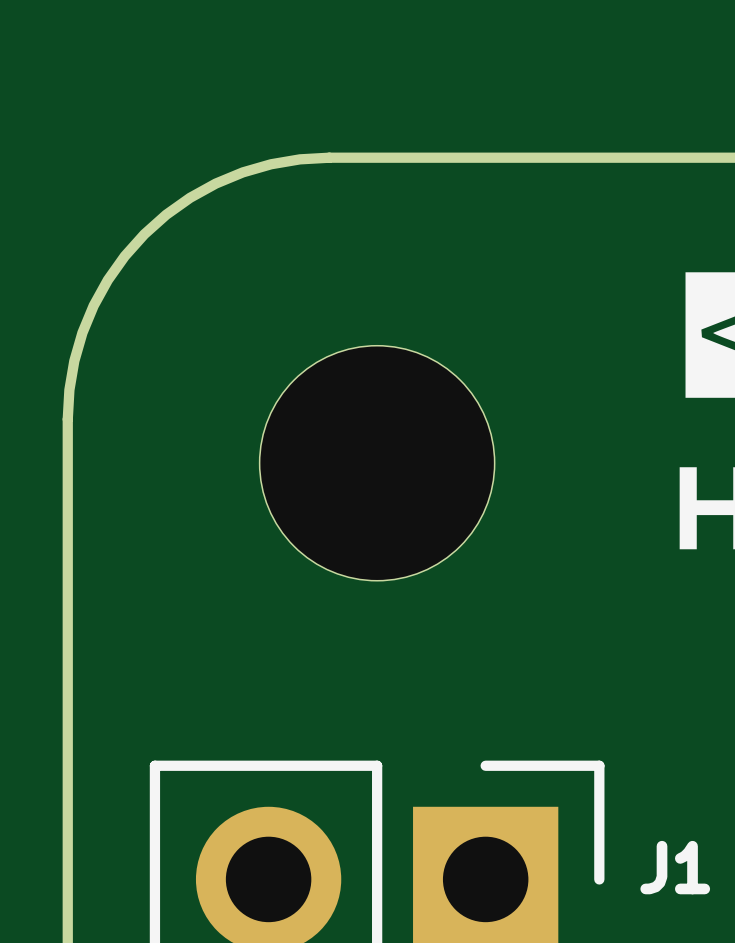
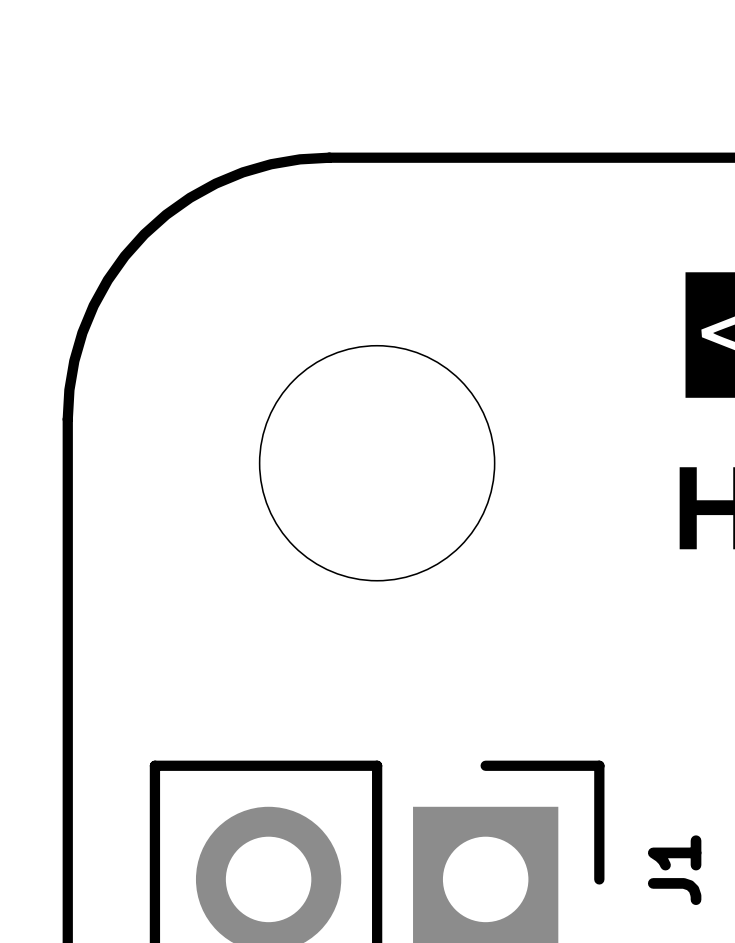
J1 name rotation: 0° (675, 867) -> 90° counterclockwise (674, 870)

